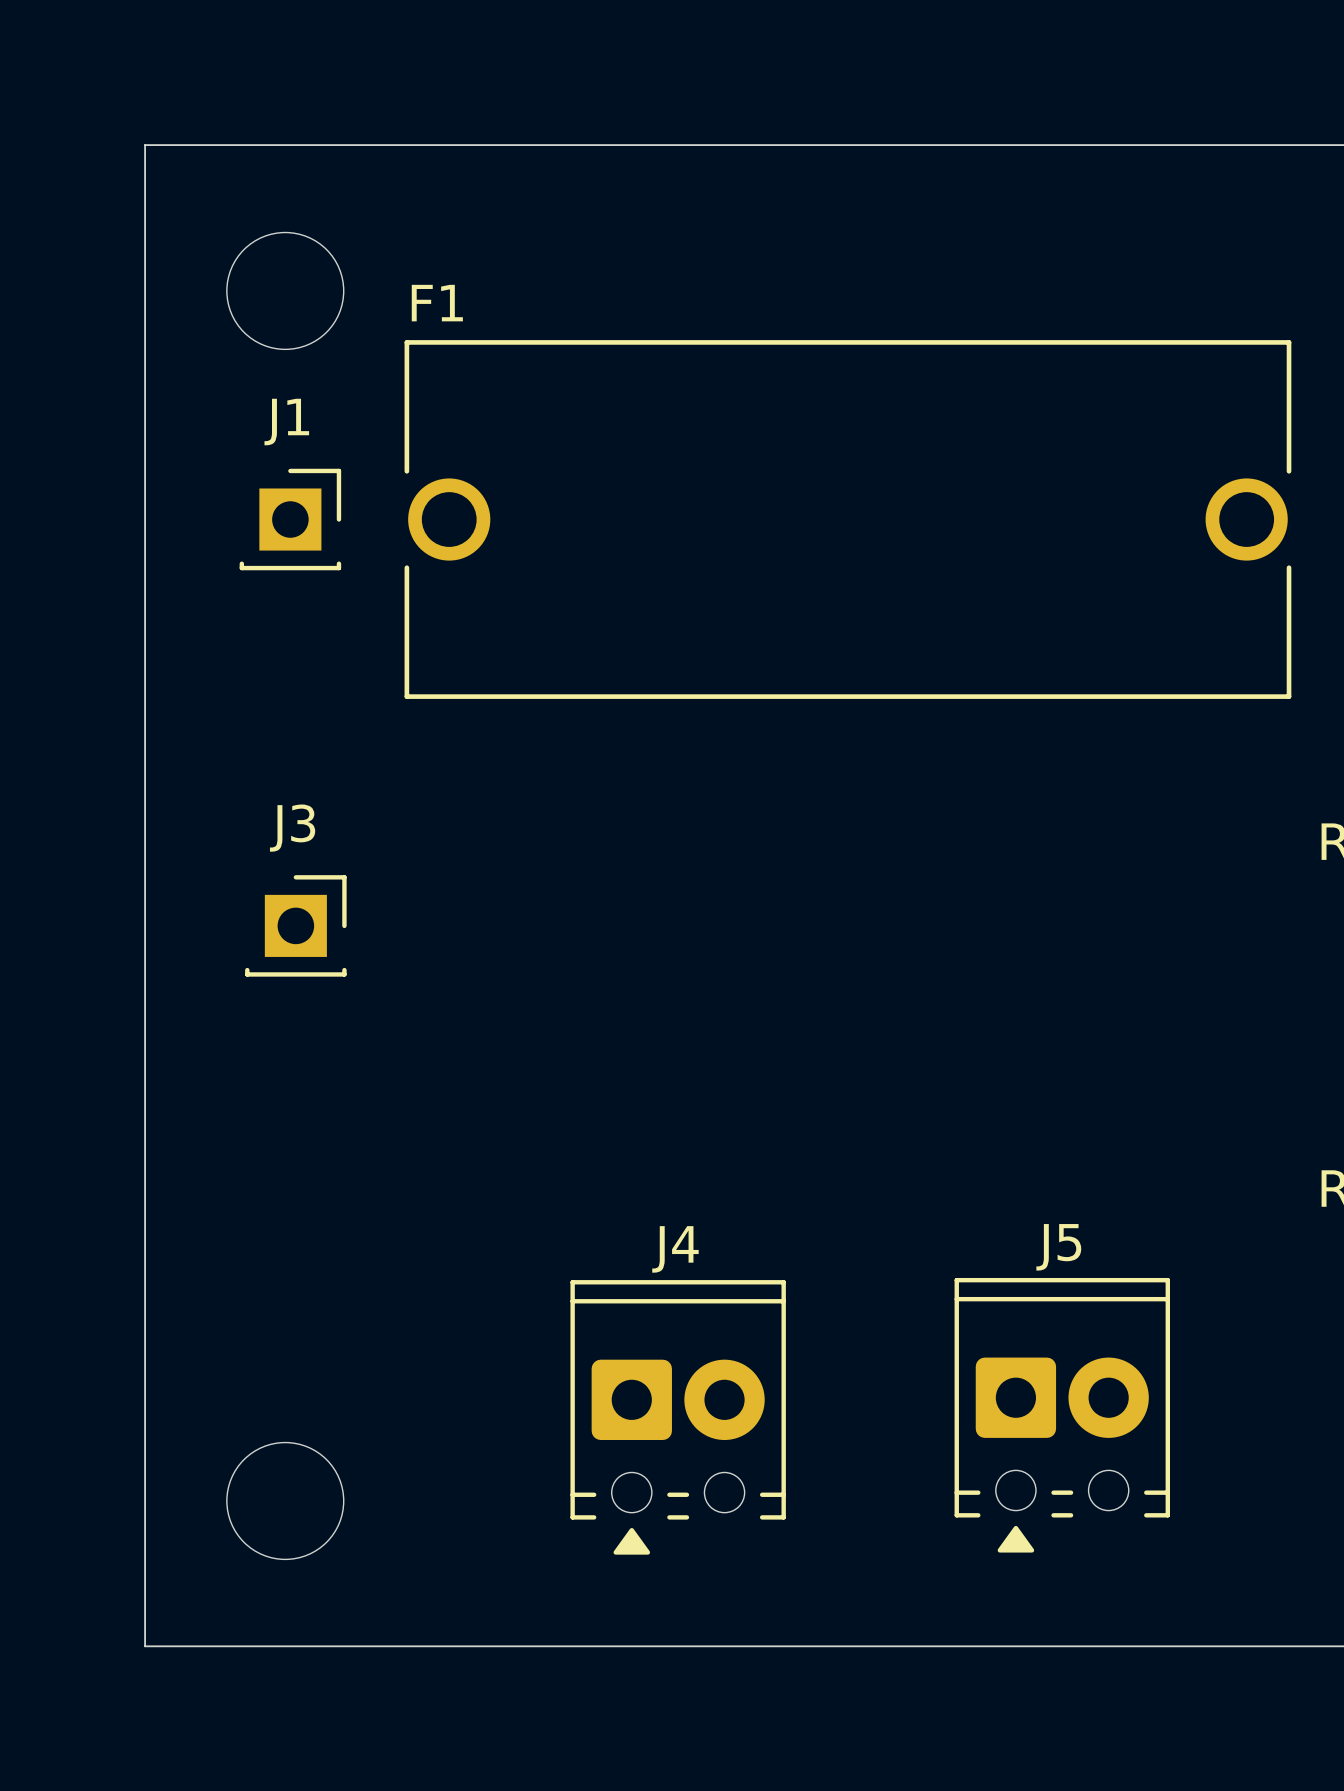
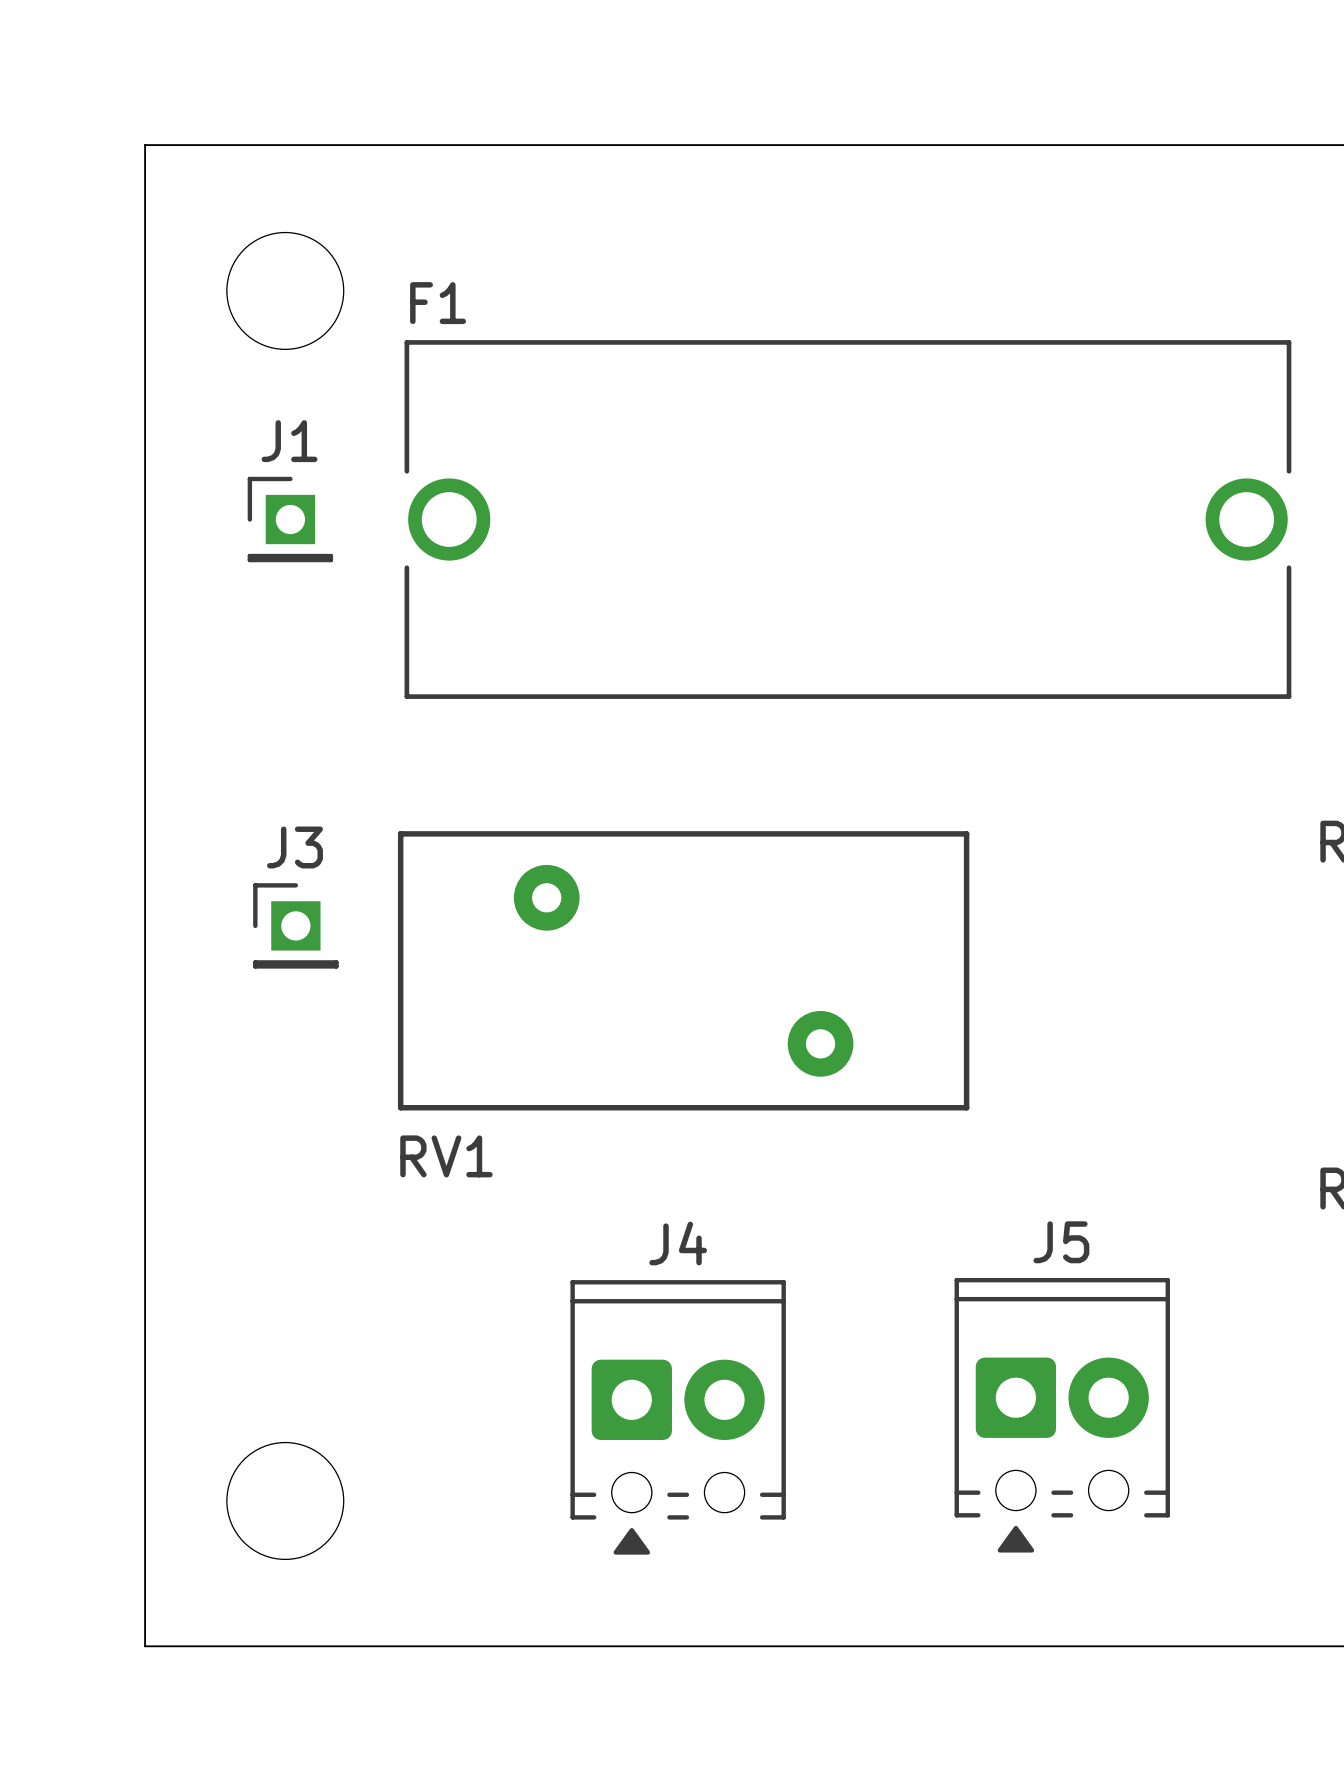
J1 footprint: [239, 468, 342, 571] -> [247, 476, 334, 563]
J3 footprint: [245, 875, 347, 977] -> [253, 883, 339, 969]
RV1: none -> (683, 970)

